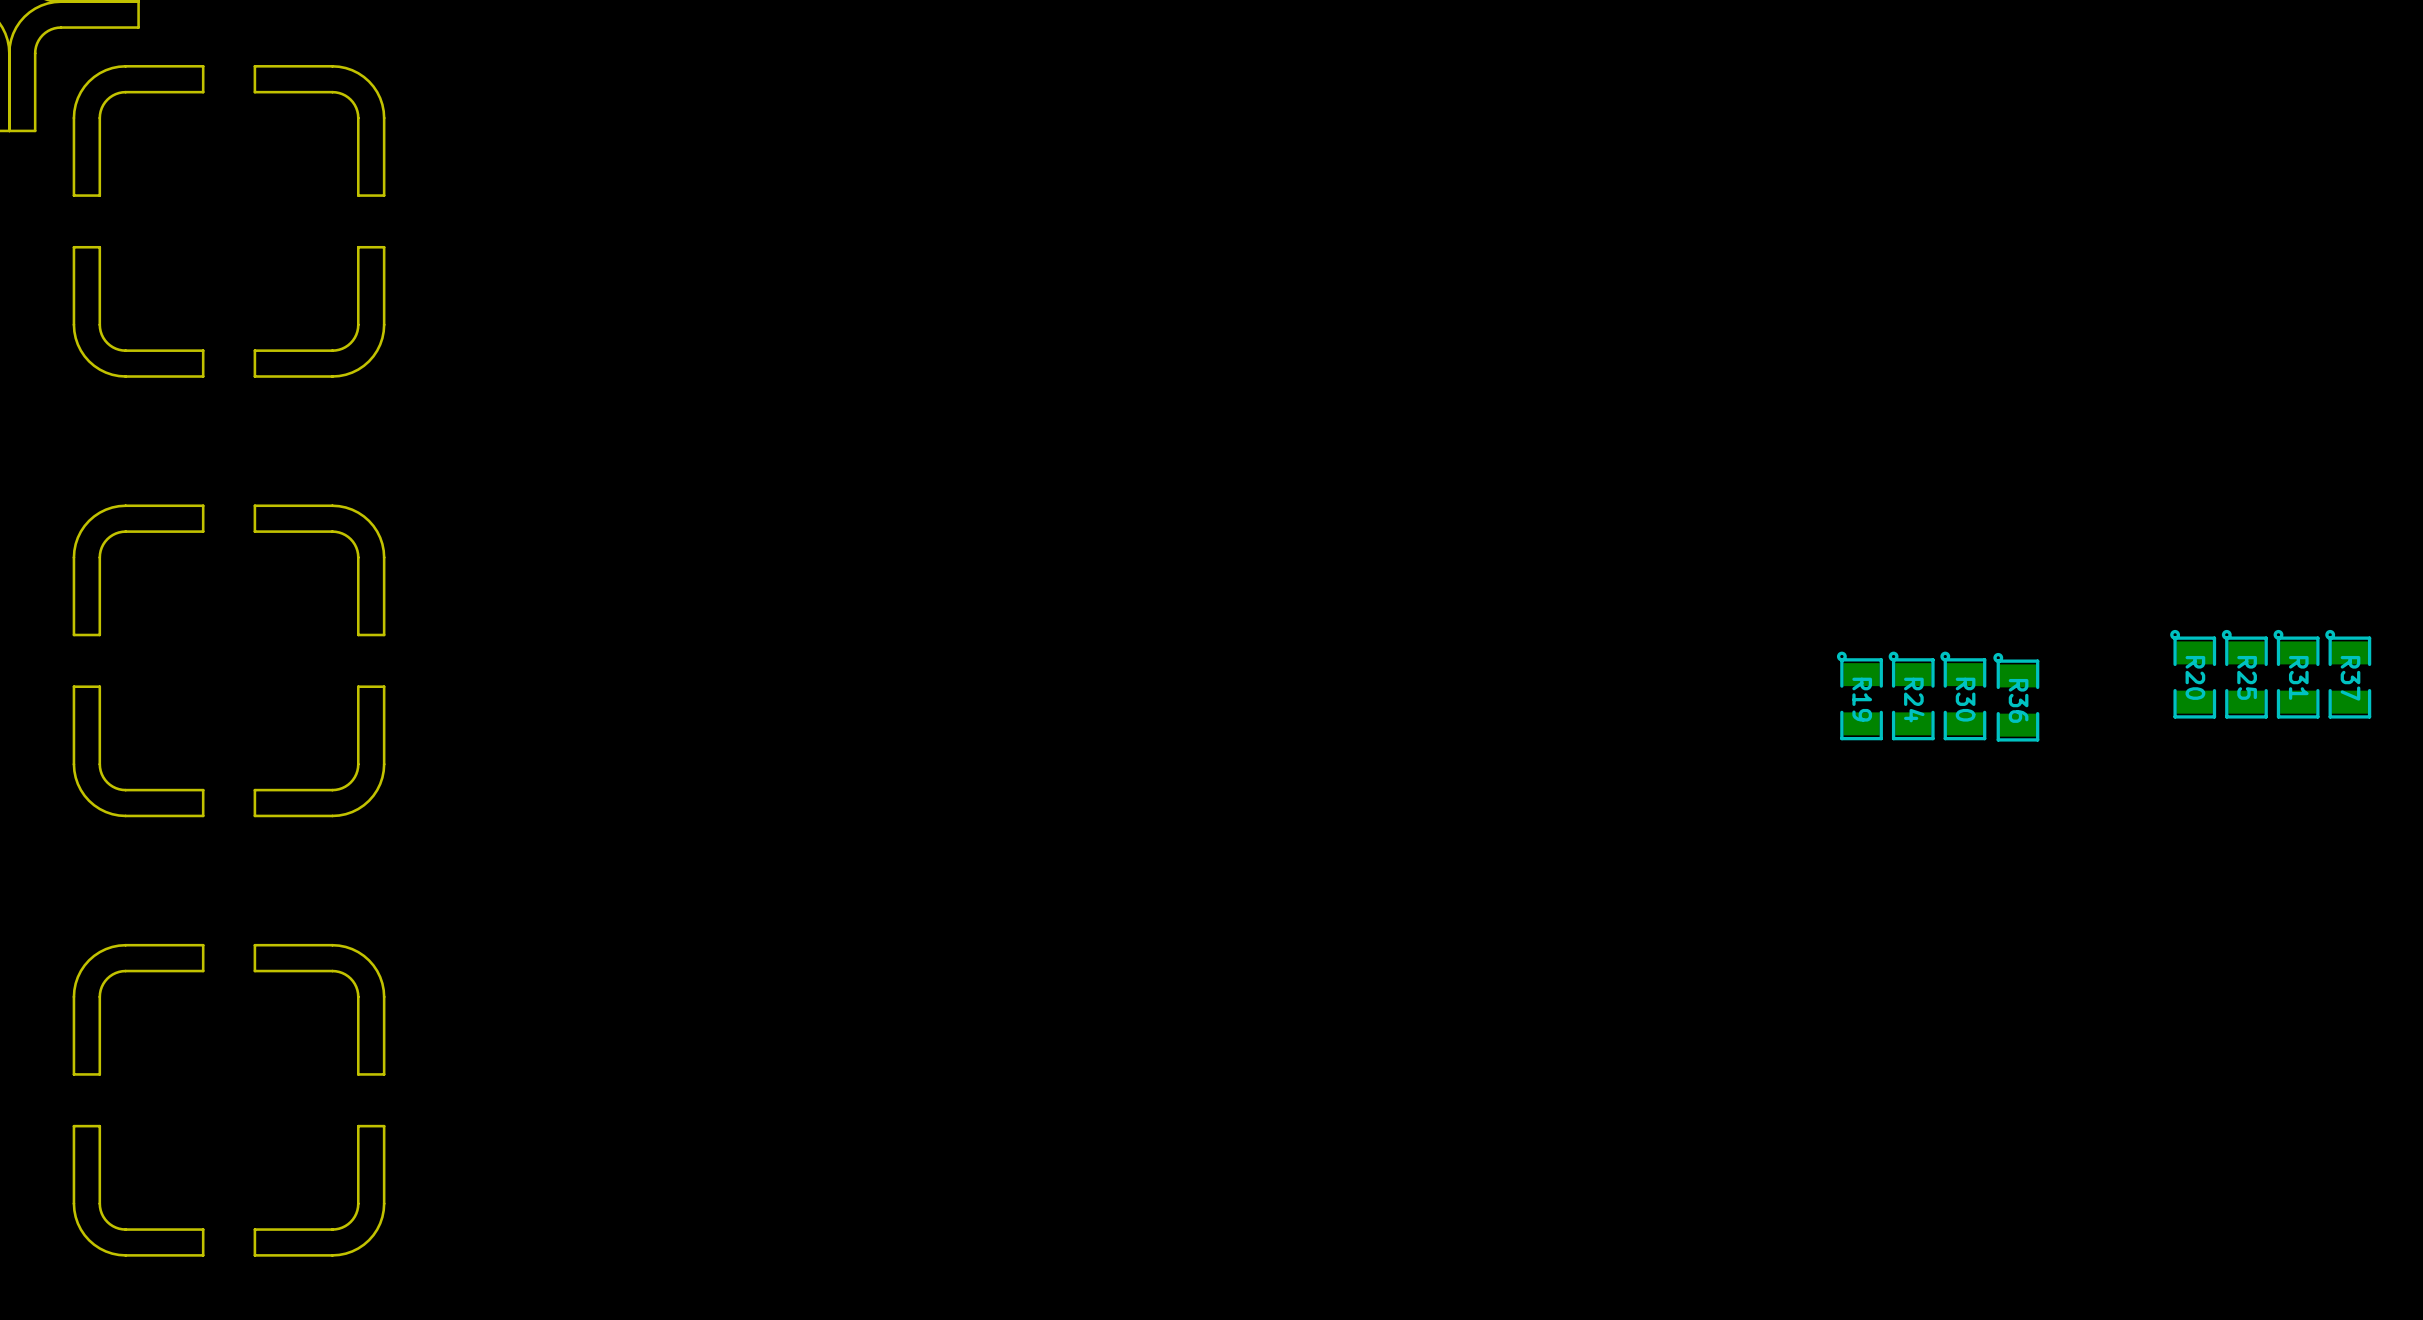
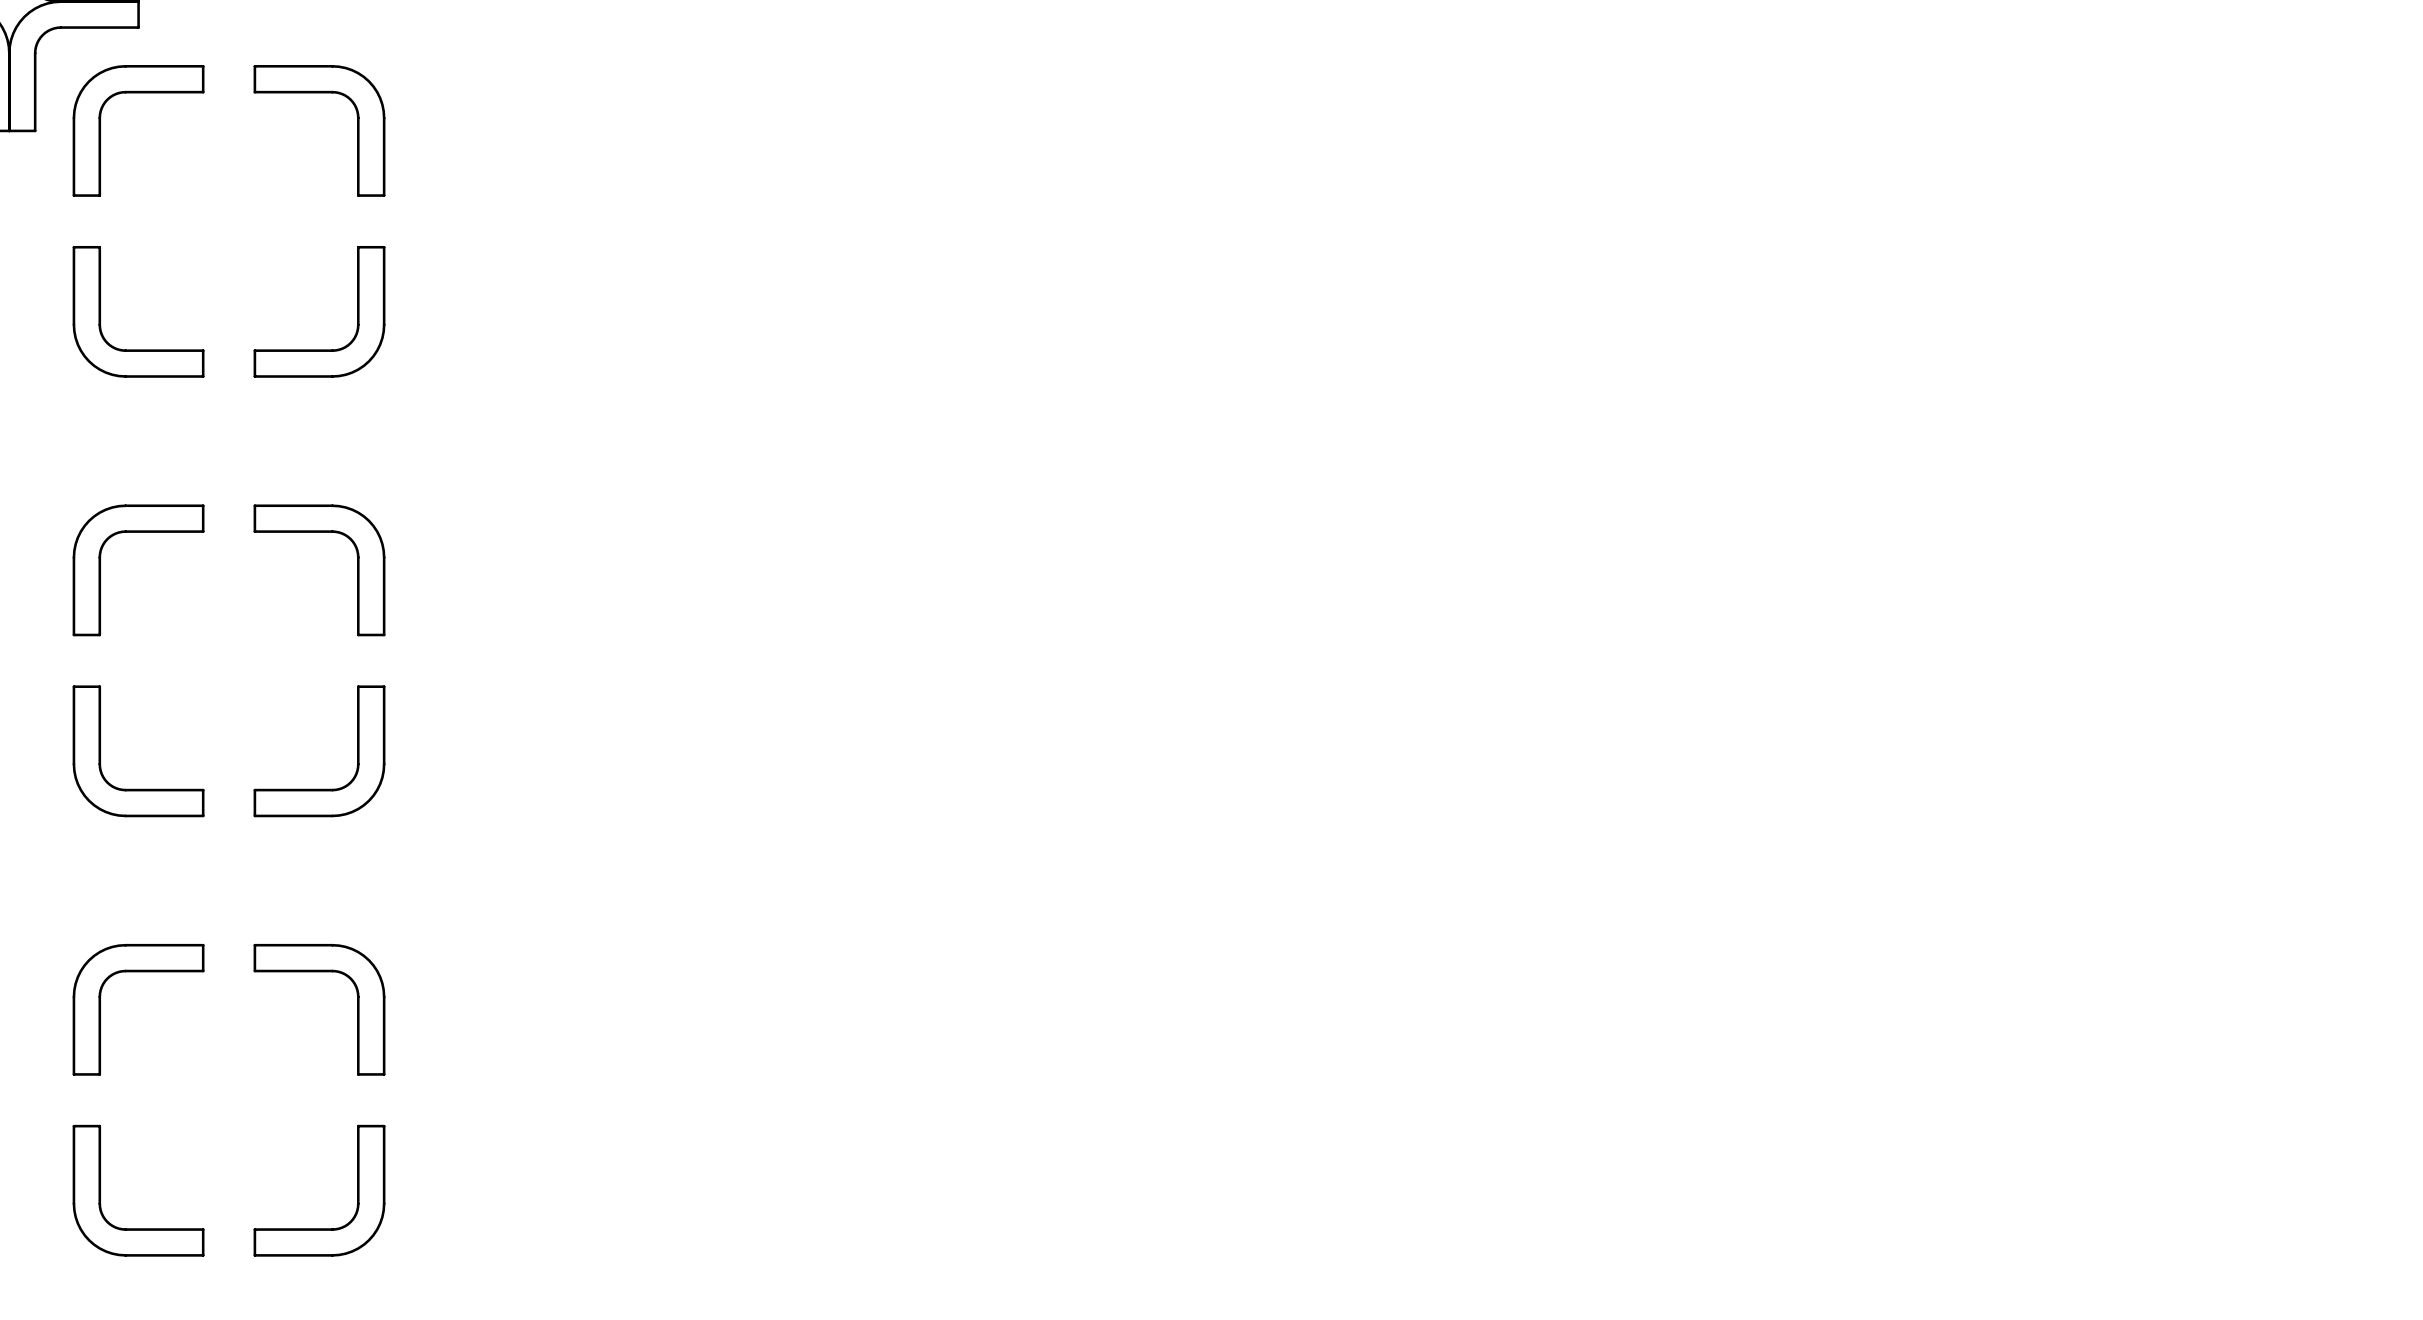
R20: (2193, 674) -> none
R25: (2244, 674) -> none
R31: (2296, 674) -> none
R37: (2348, 674) -> none
R19: (1859, 695) -> none
R24: (1911, 695) -> none
R30: (1963, 695) -> none
R36: (2016, 697) -> none

